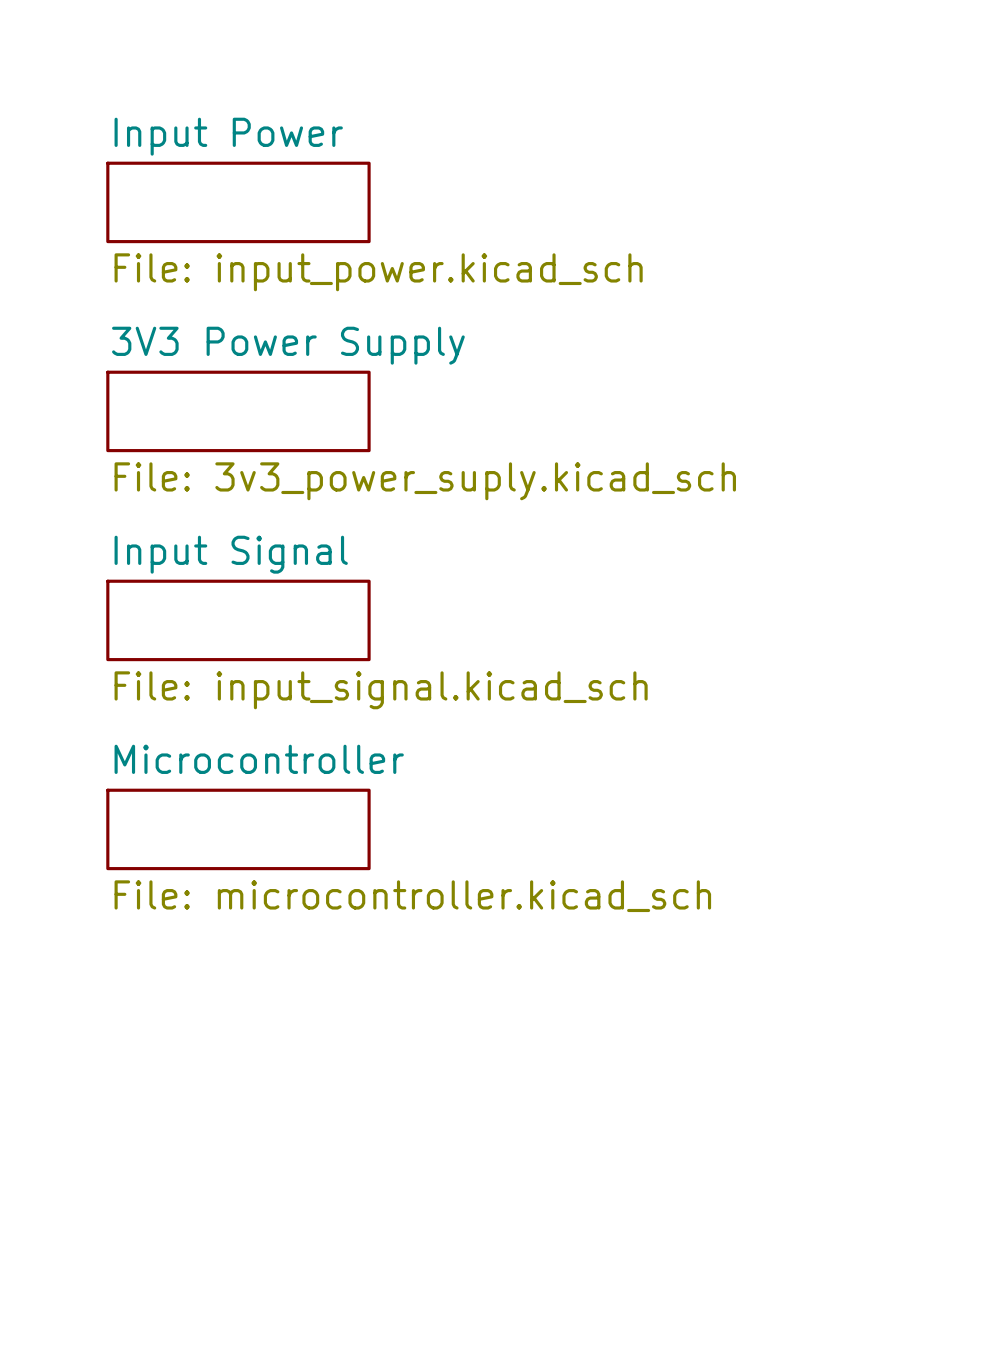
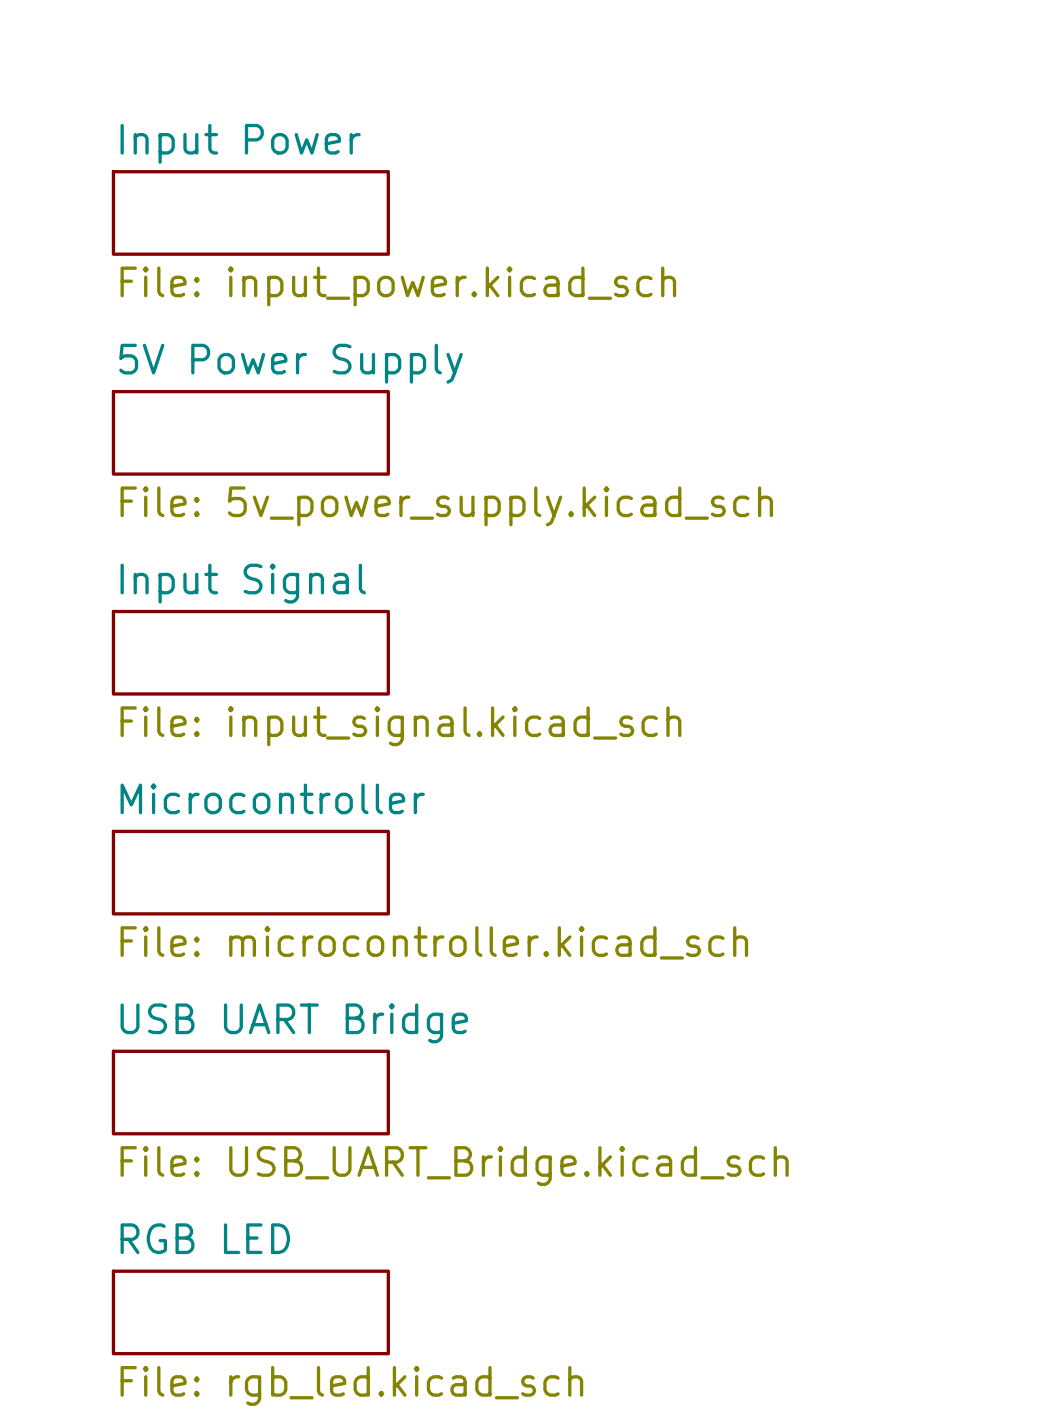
sheet 3V3 Power Supply name: 3V3 Power Supply (288, 345) -> 5V Power Supply (291, 363)
sheet 3V3 Power Supply value: File: 3v3_power_suply.kicad_sch (425, 481) -> File: 5v_power_supply.kicad_sch (446, 506)
sheet USB UART Bridge: none -> File: USB_UART_Bridge.kicad_sch (250, 1092)
sheet RGB LED: none -> File: rgb_led.kicad_sch (250, 1312)

